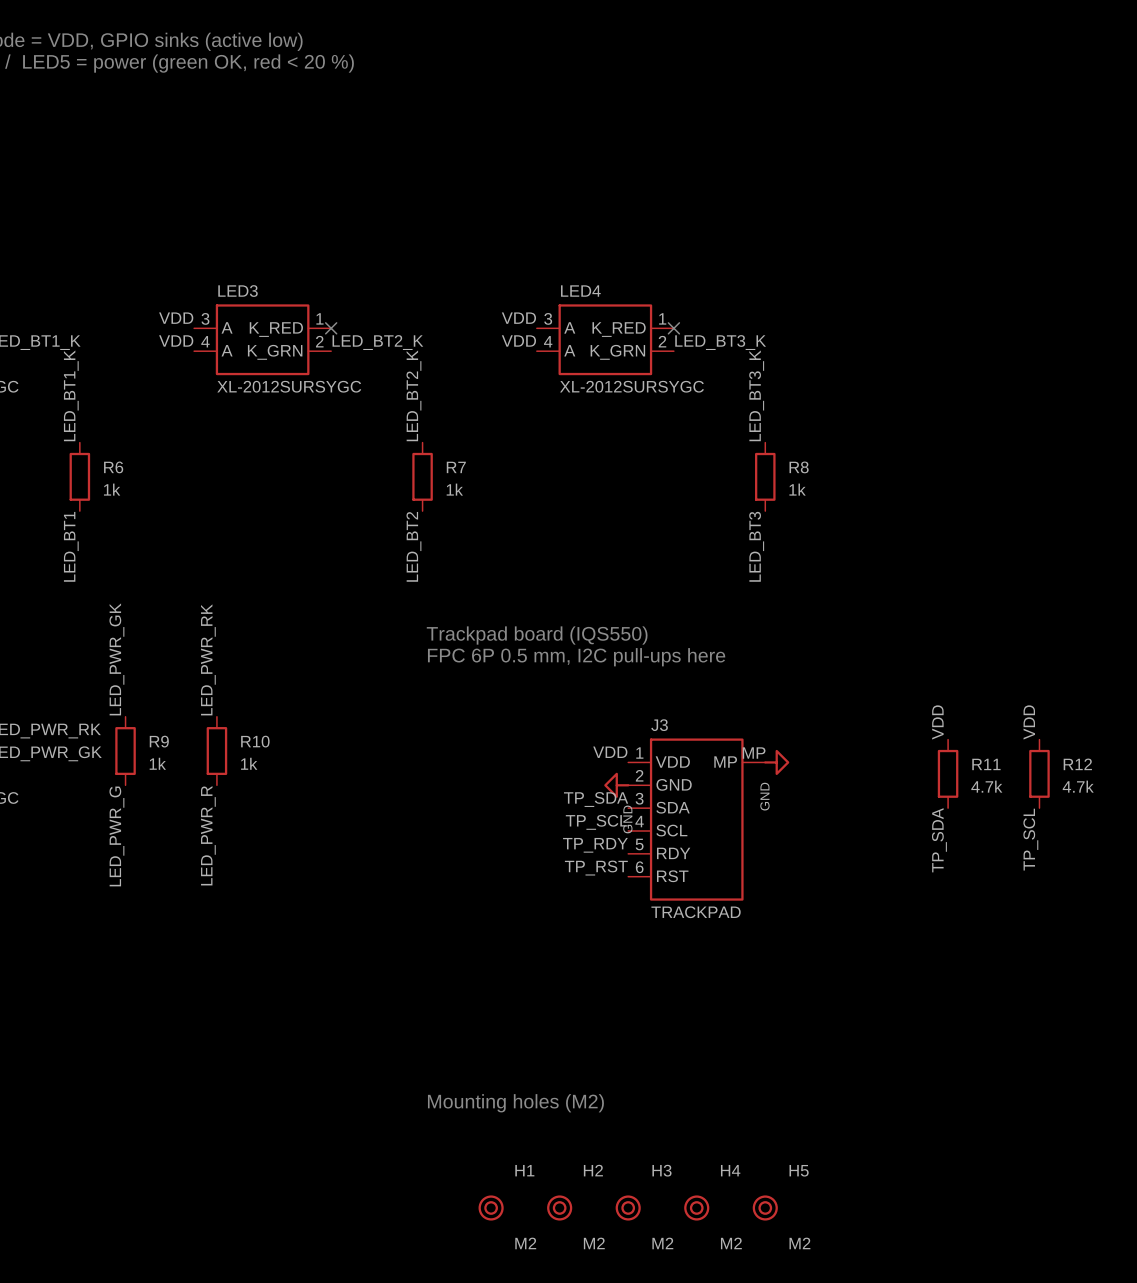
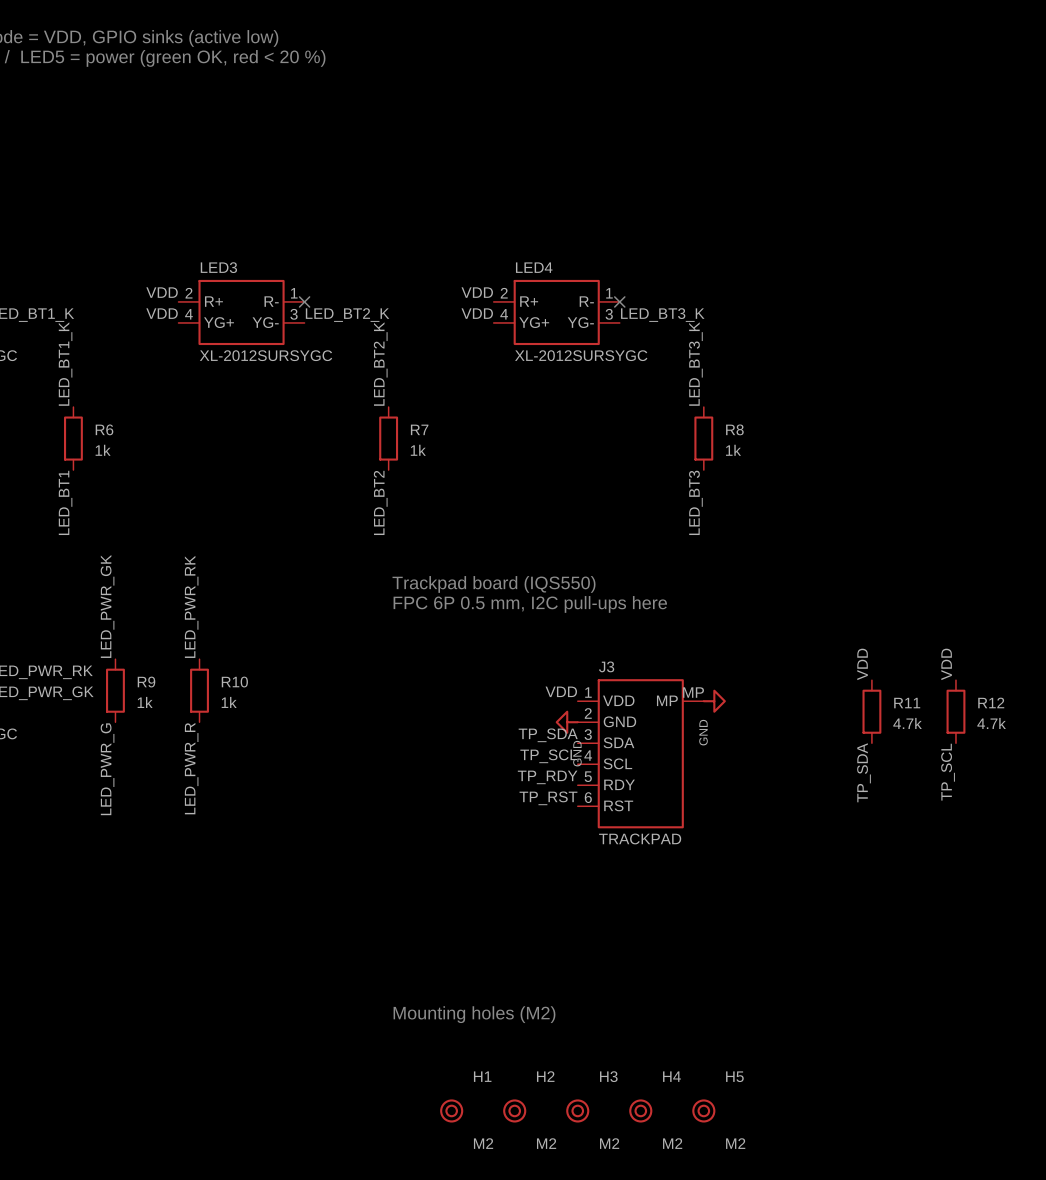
LED3 pin number: 3 (205, 318) -> 2 (189, 293)
LED4 pin number: 3 (548, 318) -> 2 (504, 293)
LED3 pin name: A (227, 327) -> R+ (213, 301)
LED4 pin name: A (569, 327) -> R+ (529, 301)
LED3 pin name: K_RED (276, 329) -> R- (271, 301)
LED4 pin name: K_RED (619, 329) -> R- (586, 301)
LED3 pin number: 2 (319, 341) -> 3 (294, 314)
LED4 pin number: 2 (662, 341) -> 3 (609, 314)
LED3 pin name: A (227, 350) -> YG+ (219, 322)
LED4 pin name: A (569, 350) -> YG+ (534, 322)
LED3 pin name: K_GRN (275, 352) -> YG- (265, 322)
LED4 pin name: K_GRN (617, 352) -> YG- (580, 322)

